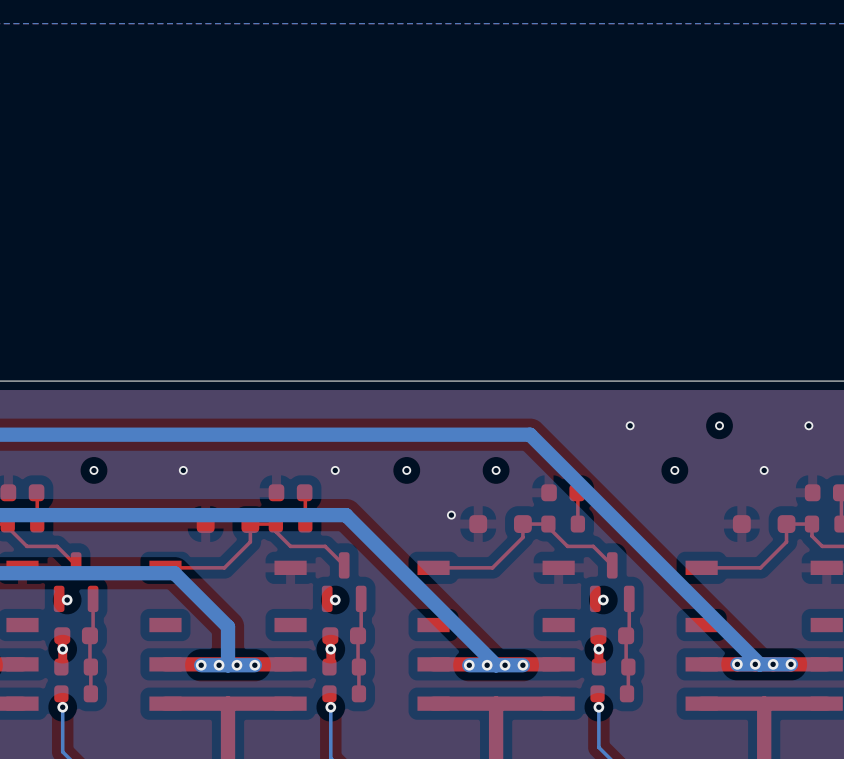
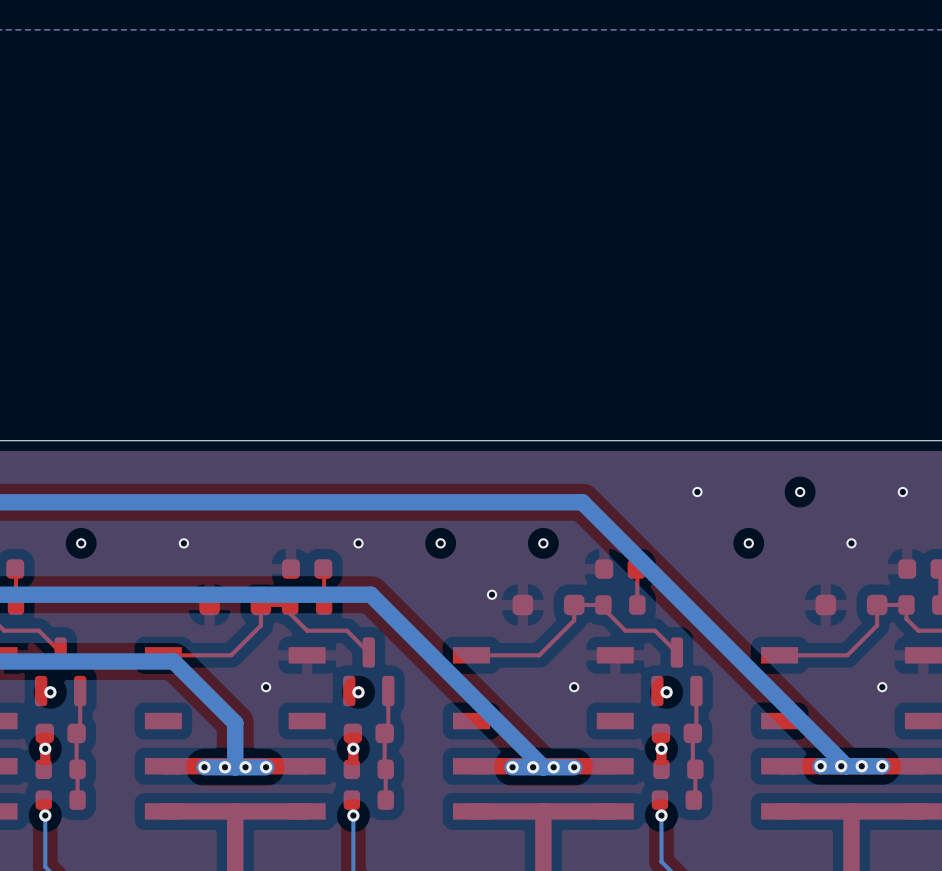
via: none -> (266, 687)
via: none -> (574, 687)
via: none -> (882, 687)

